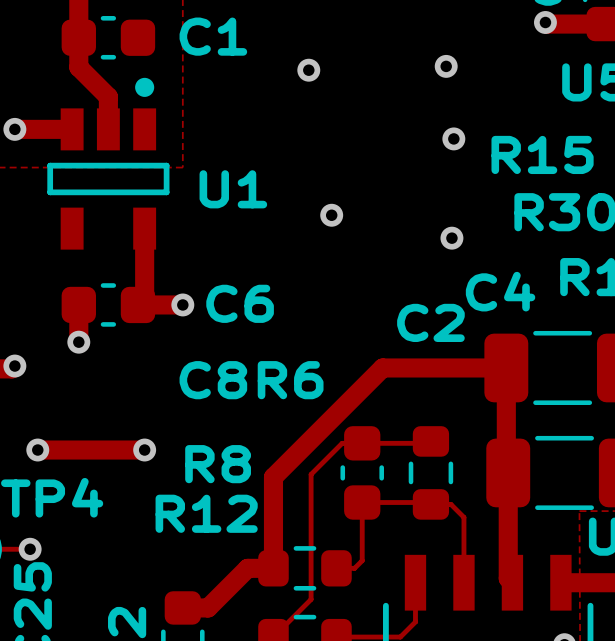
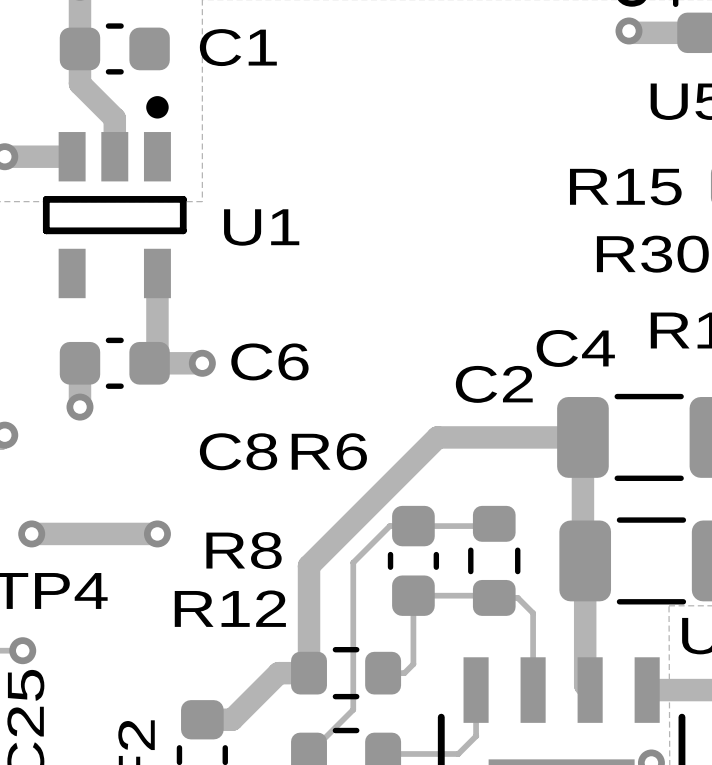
via: (446, 66) -> none
via: (308, 70) -> none
via: (453, 138) -> none
via: (331, 215) -> none
via: (451, 238) -> none

